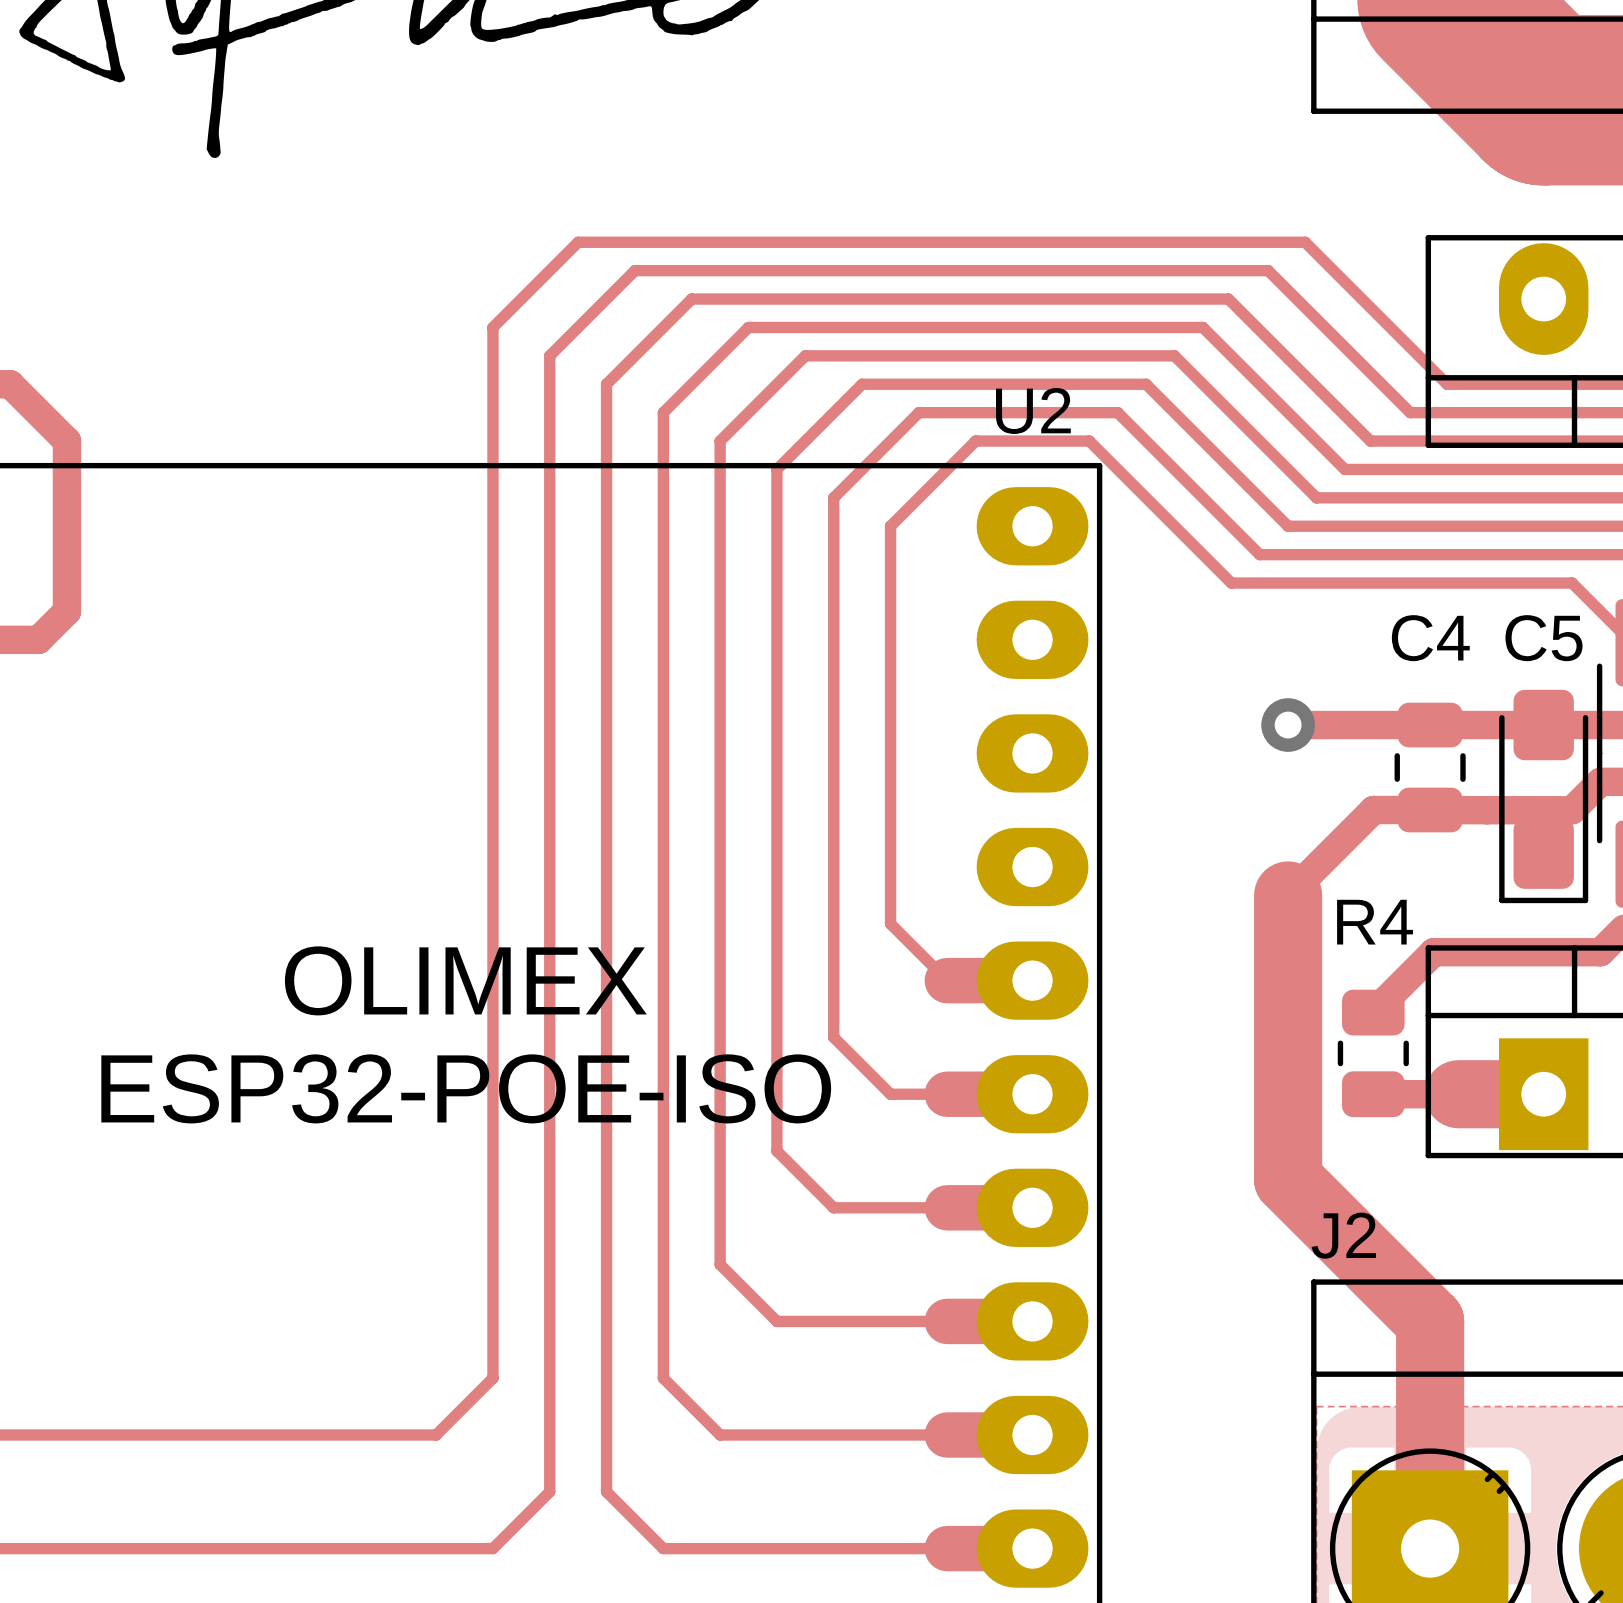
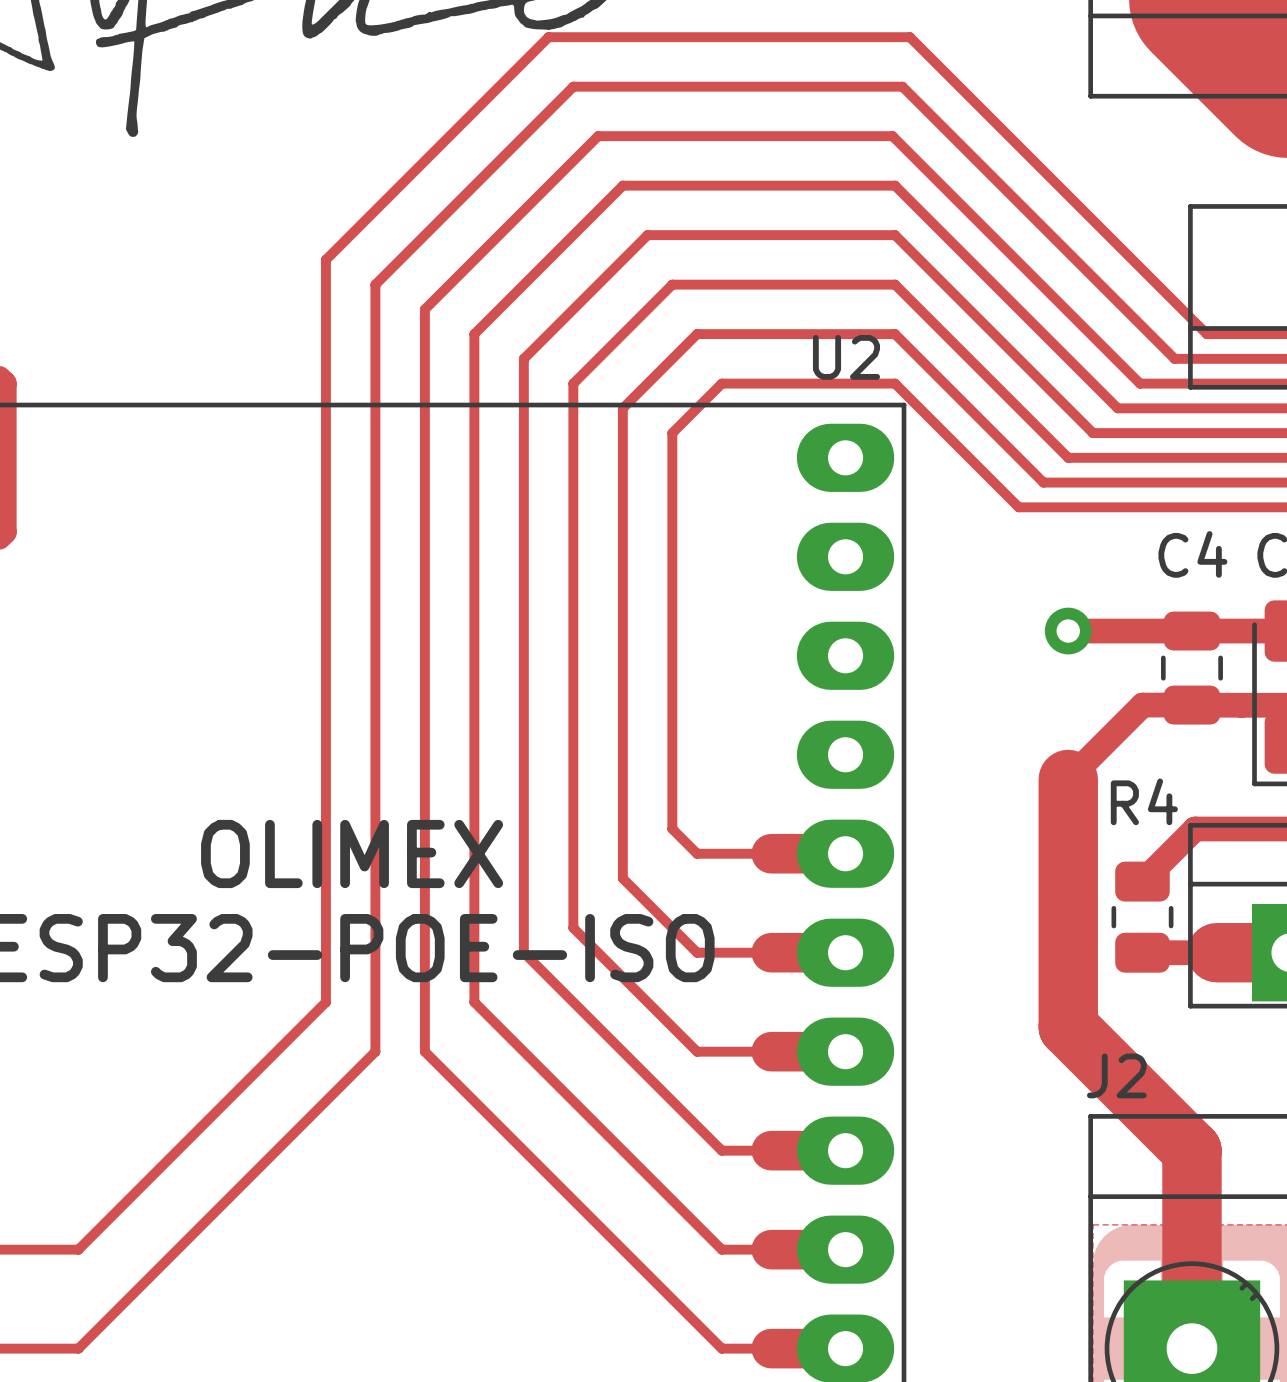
track: (578, 242) (1305, 242) -> (449, 210) (573, 86) (902, 86) (1050, 235)
track: (634, 270) (805, 270) -> (499, 235) (598, 136) (892, 136) (1016, 259)
track: (1089, 270) (1268, 270) -> (895, 235) (969, 309)
track: (691, 299) (1228, 299) -> (548, 259) (622, 185) (895, 185) (994, 284)
track: (748, 327) (833, 327) -> (598, 284) (647, 235)
track: (1089, 327) (1202, 327) -> (895, 284) (944, 334)
track: (805, 355) (1174, 355) -> (647, 309) (672, 284)
track: (1089, 384) (1146, 384) -> (895, 334) (919, 358)
track: (1117, 412) (918, 412) (890, 441) -> (796, 383) (721, 383)
track: (975, 441) (890, 526) (890, 923) (947, 980) -> (672, 828) (697, 853) (771, 853)
track: (833, 952) (833, 1037) (890, 1094) -> (622, 878) (697, 952) (721, 952)
track: (776, 1009) (776, 1151) (833, 1207) (862, 1207) -> (573, 927) (697, 1051)
track: (720, 1065) (720, 1264) -> (474, 1002) (573, 1101)
track: (663, 1094) (663, 1378) (720, 1435) (890, 1435) -> (523, 952) (721, 1150)
track: (606, 1151) (606, 1491) (663, 1548) (890, 1548) -> (424, 1051) (721, 1348)
track: (492, 1207) (492, 1378) (436, 1435) (152, 1435) -> (1083, 210) (909, 37) (548, 37) (325, 259) (325, 1002) (78, 1249)
track: (549, 1207) (549, 1491) (492, 1548) (152, 1548) -> (375, 1051) (78, 1348)
track: (776, 1321) (890, 1321) -> (622, 1150) (721, 1249)

